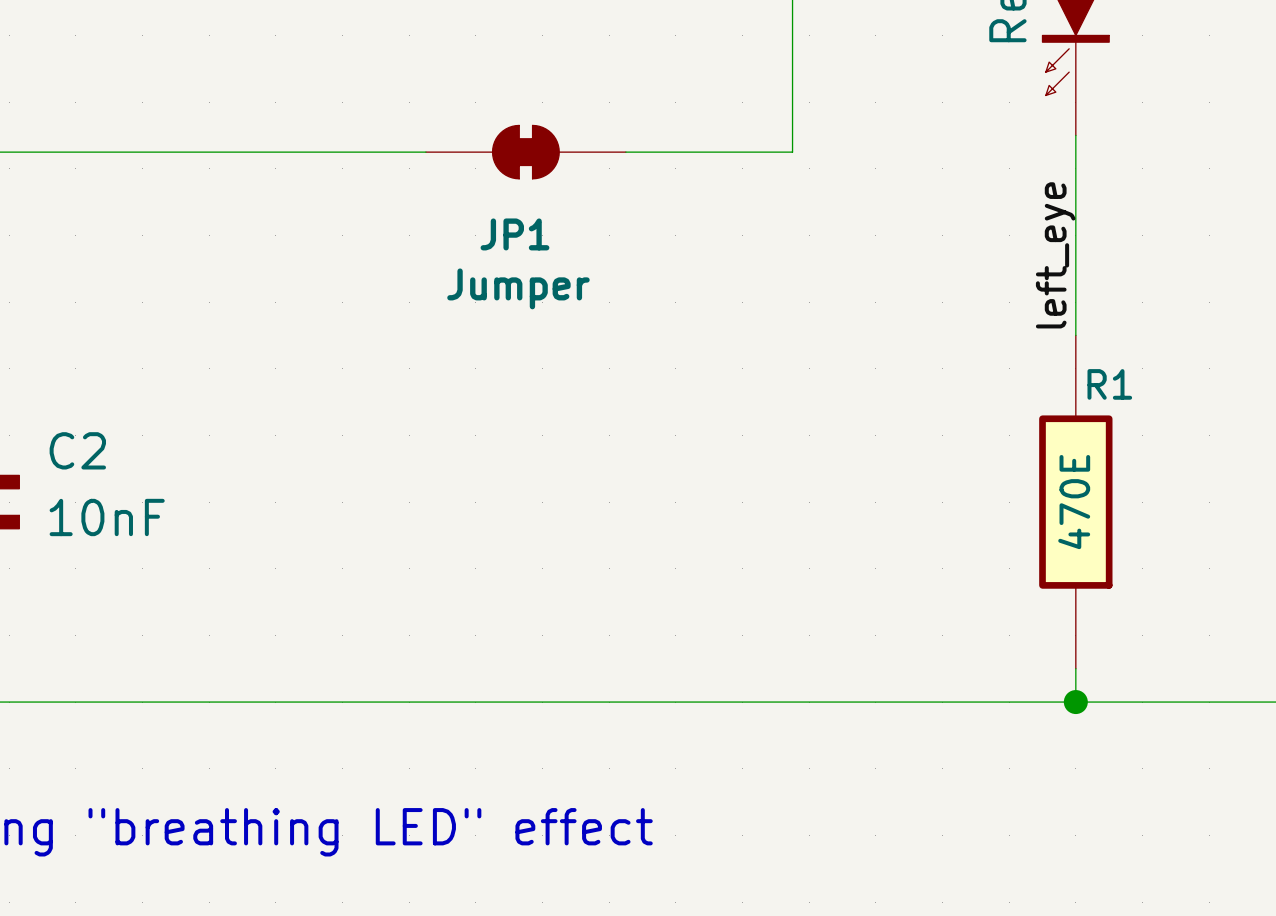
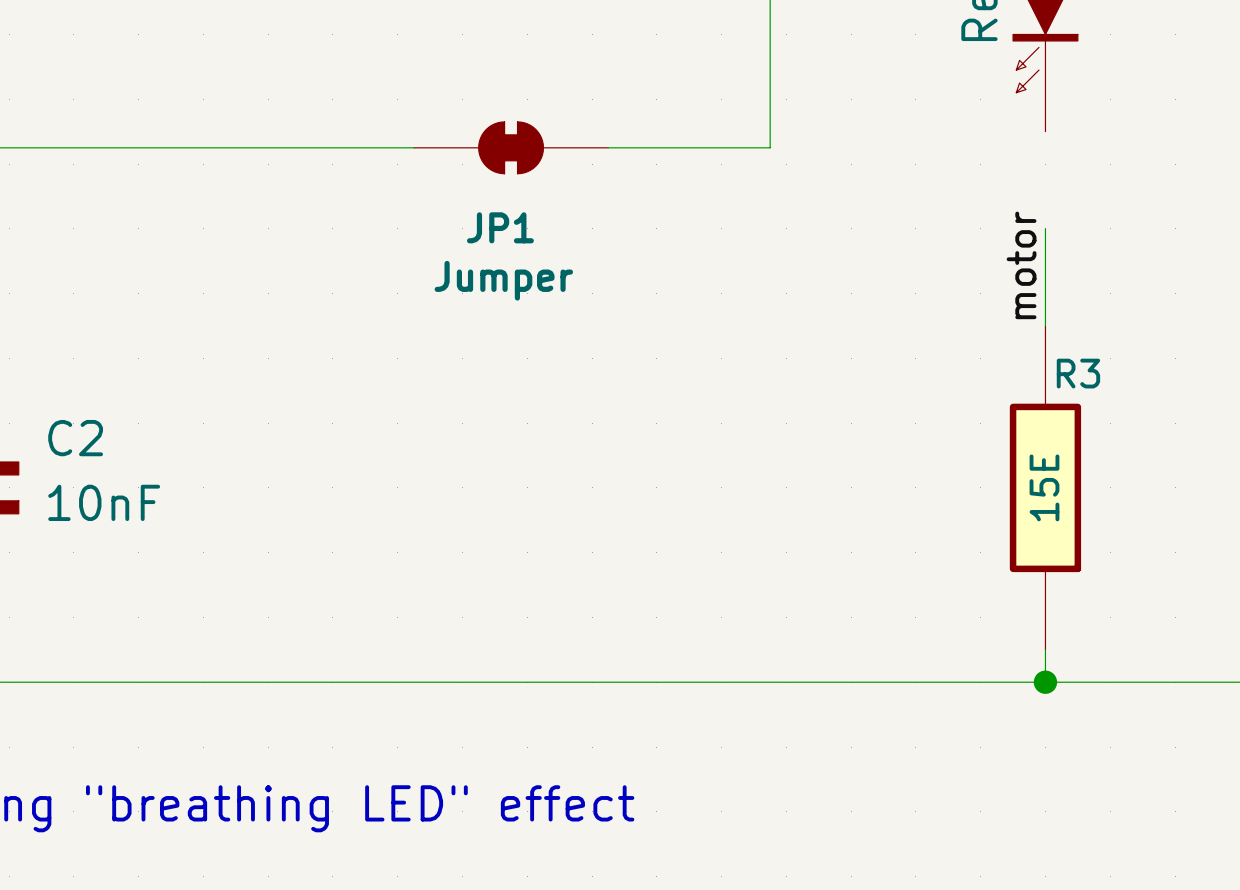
wire: (1075, 135) (1075, 235) -> none
label: left_eye (1055, 255) -> motor (1021, 265)
R1 name: R1 (1109, 384) -> R3 (1078, 373)
R1 value: 470E (1074, 502) -> 15E (1044, 487)

